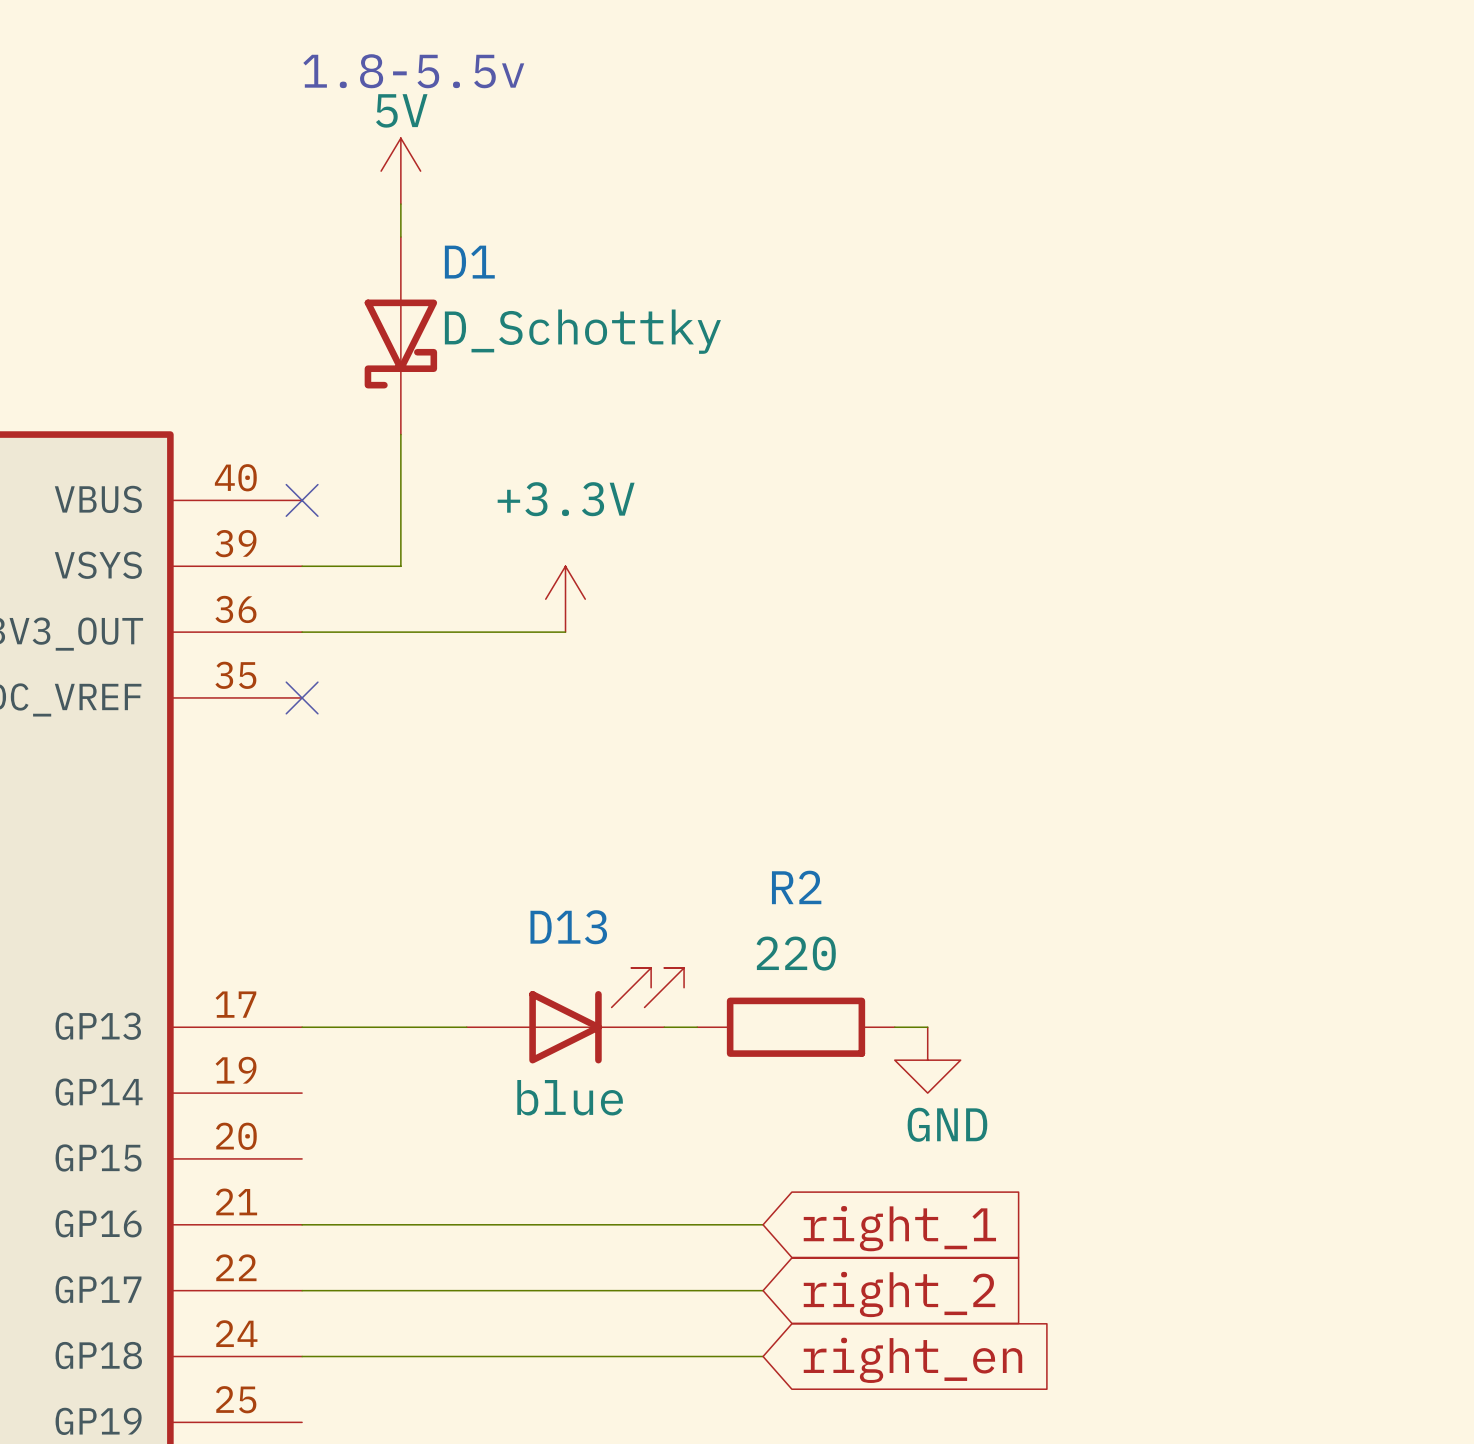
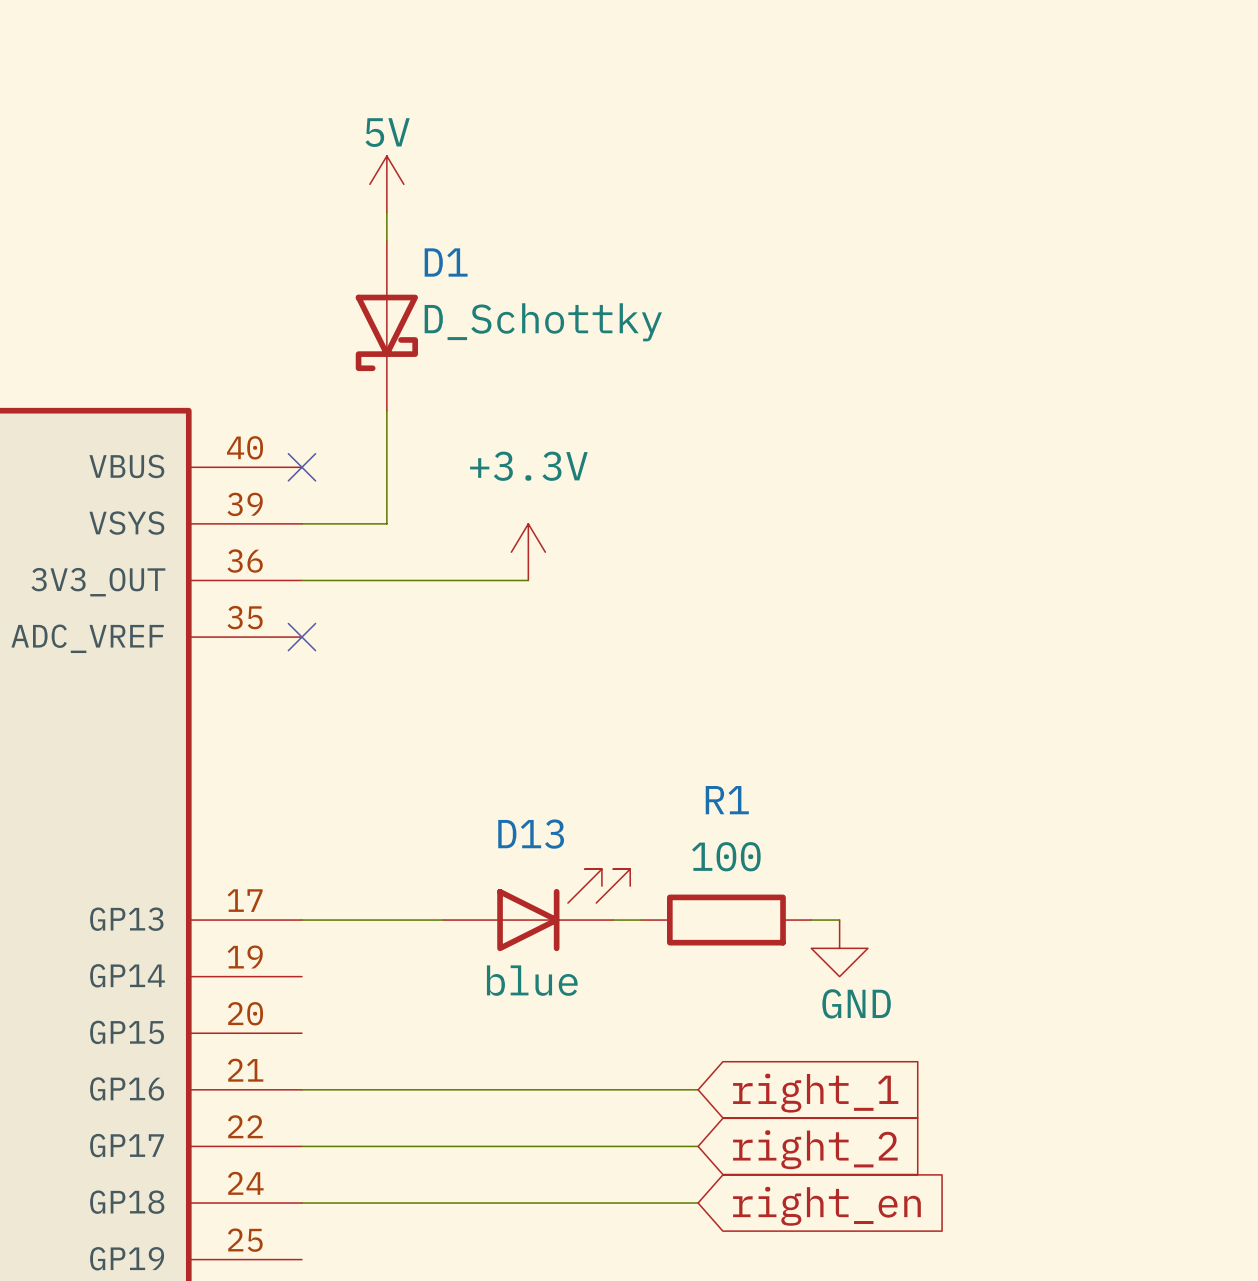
text: 1.8-5.5v (413, 71) -> none
R2 name: R2 (796, 887) -> R1 (727, 800)
R2 value: 220 (796, 953) -> 100 (726, 856)

